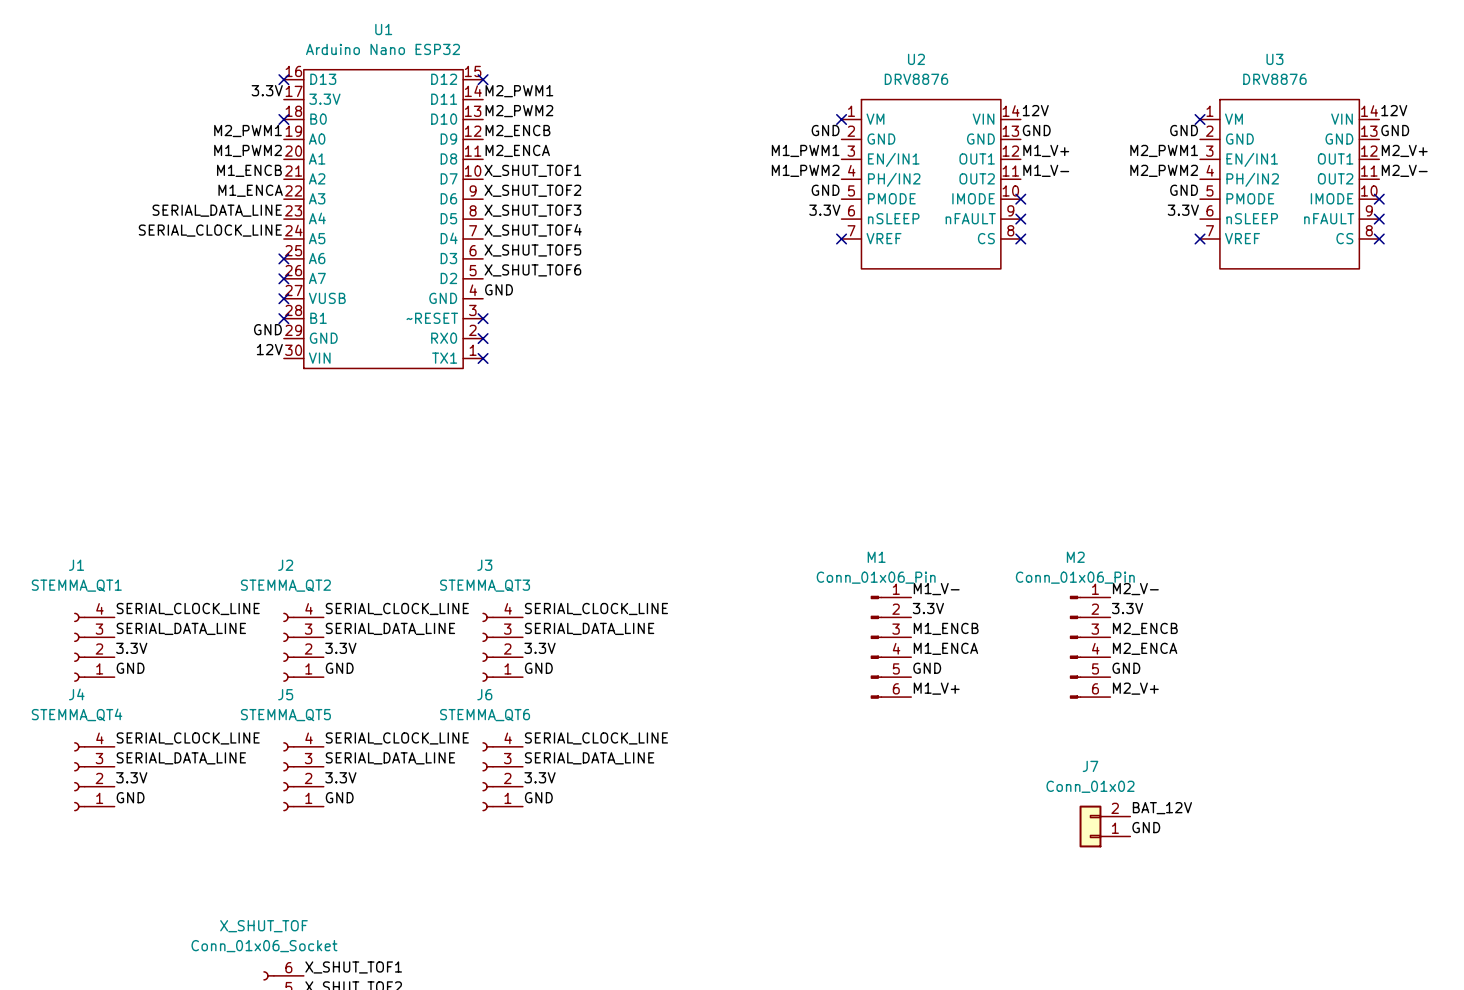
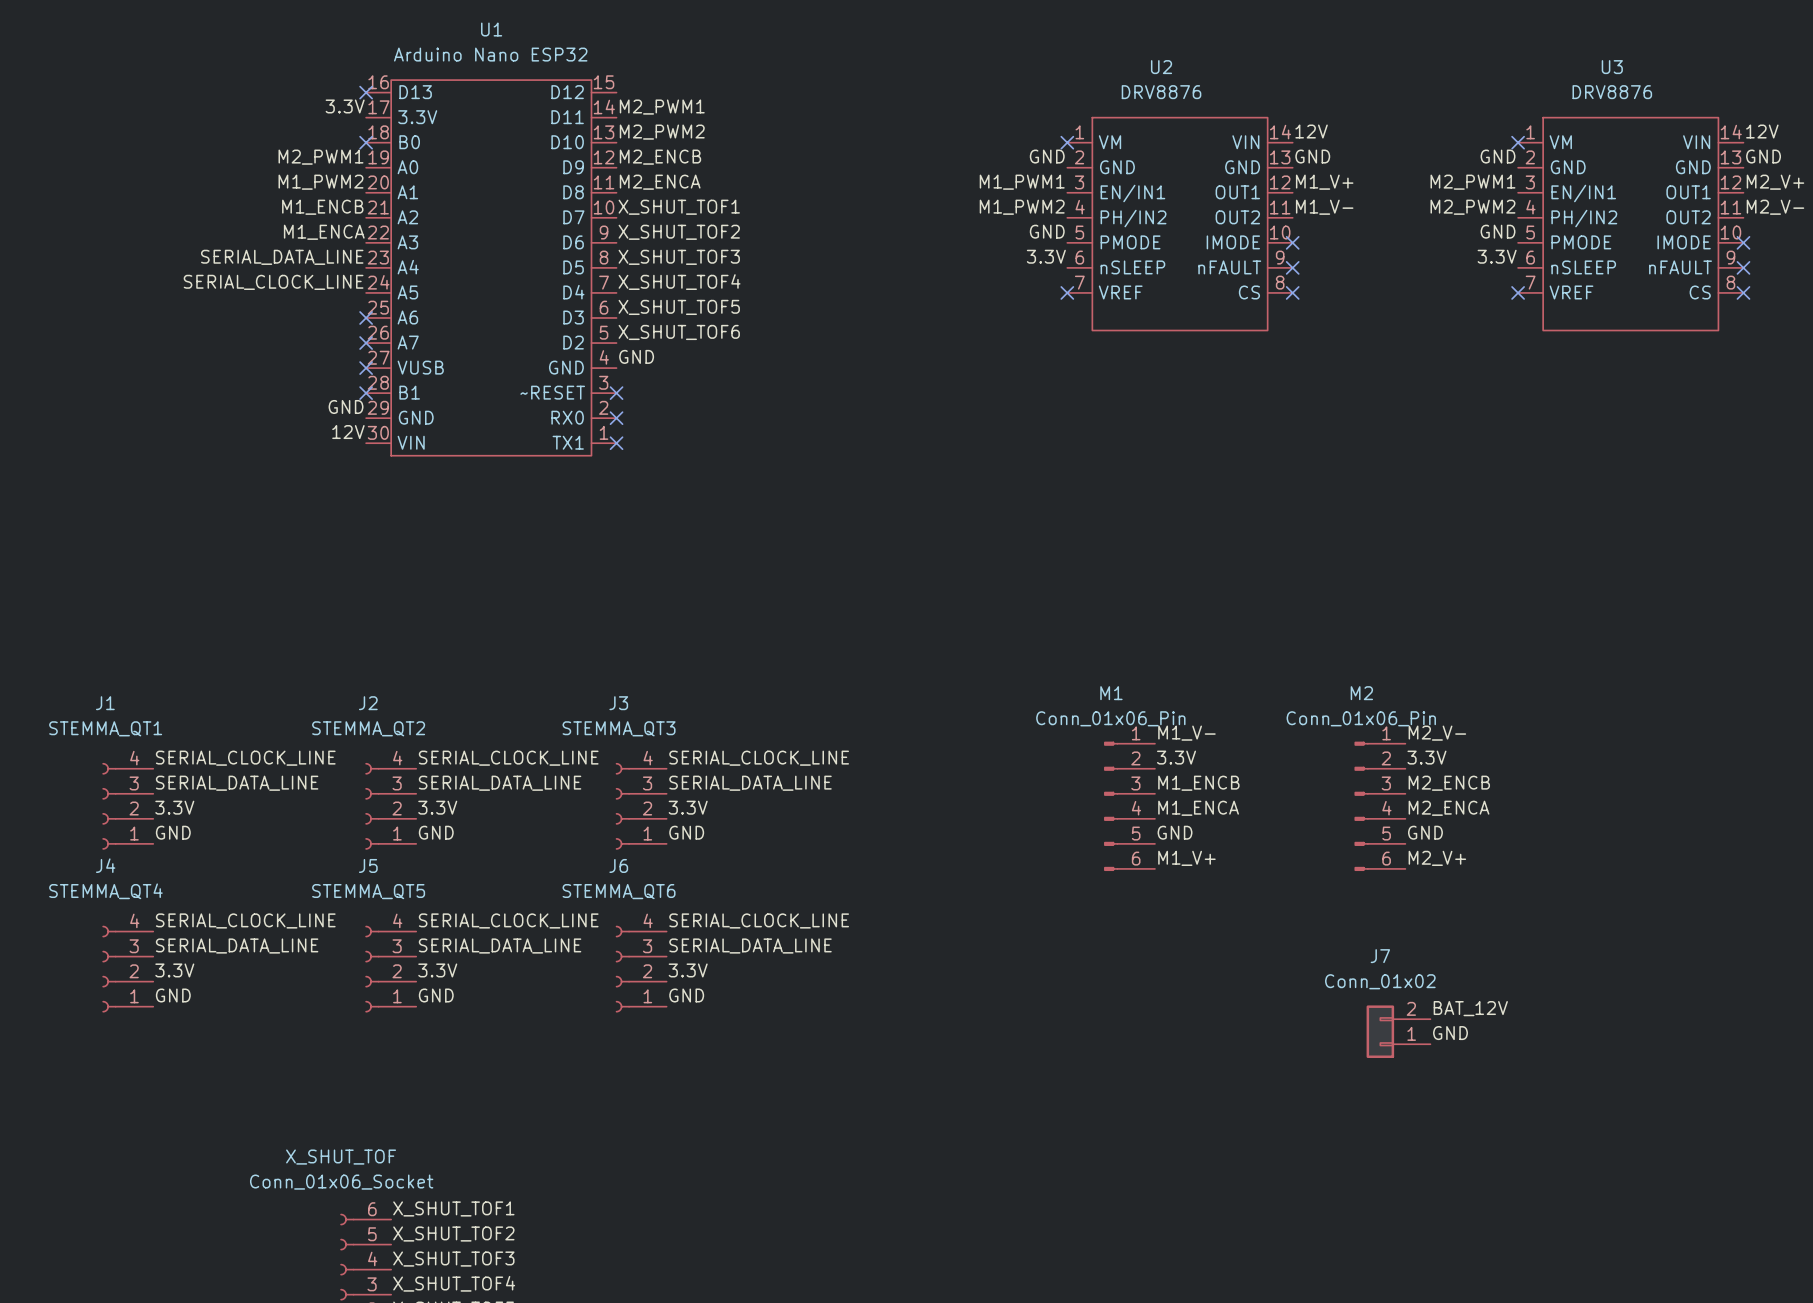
no-connect mark: (483, 79) -> none

